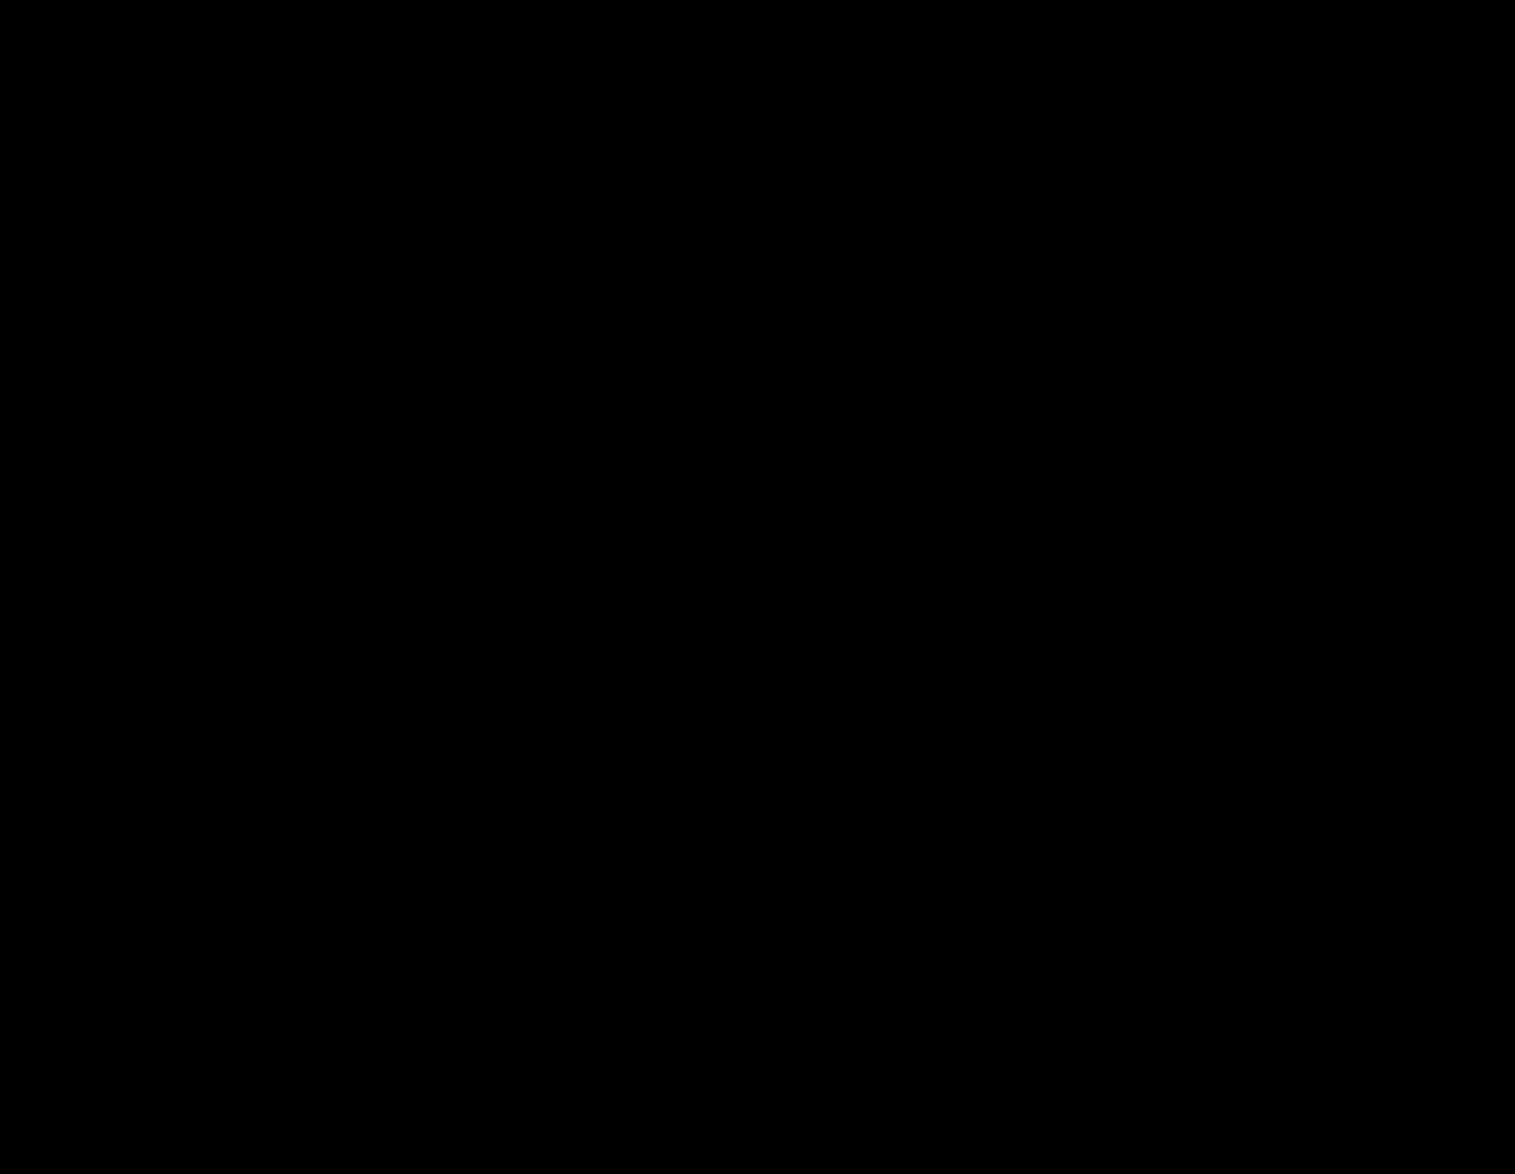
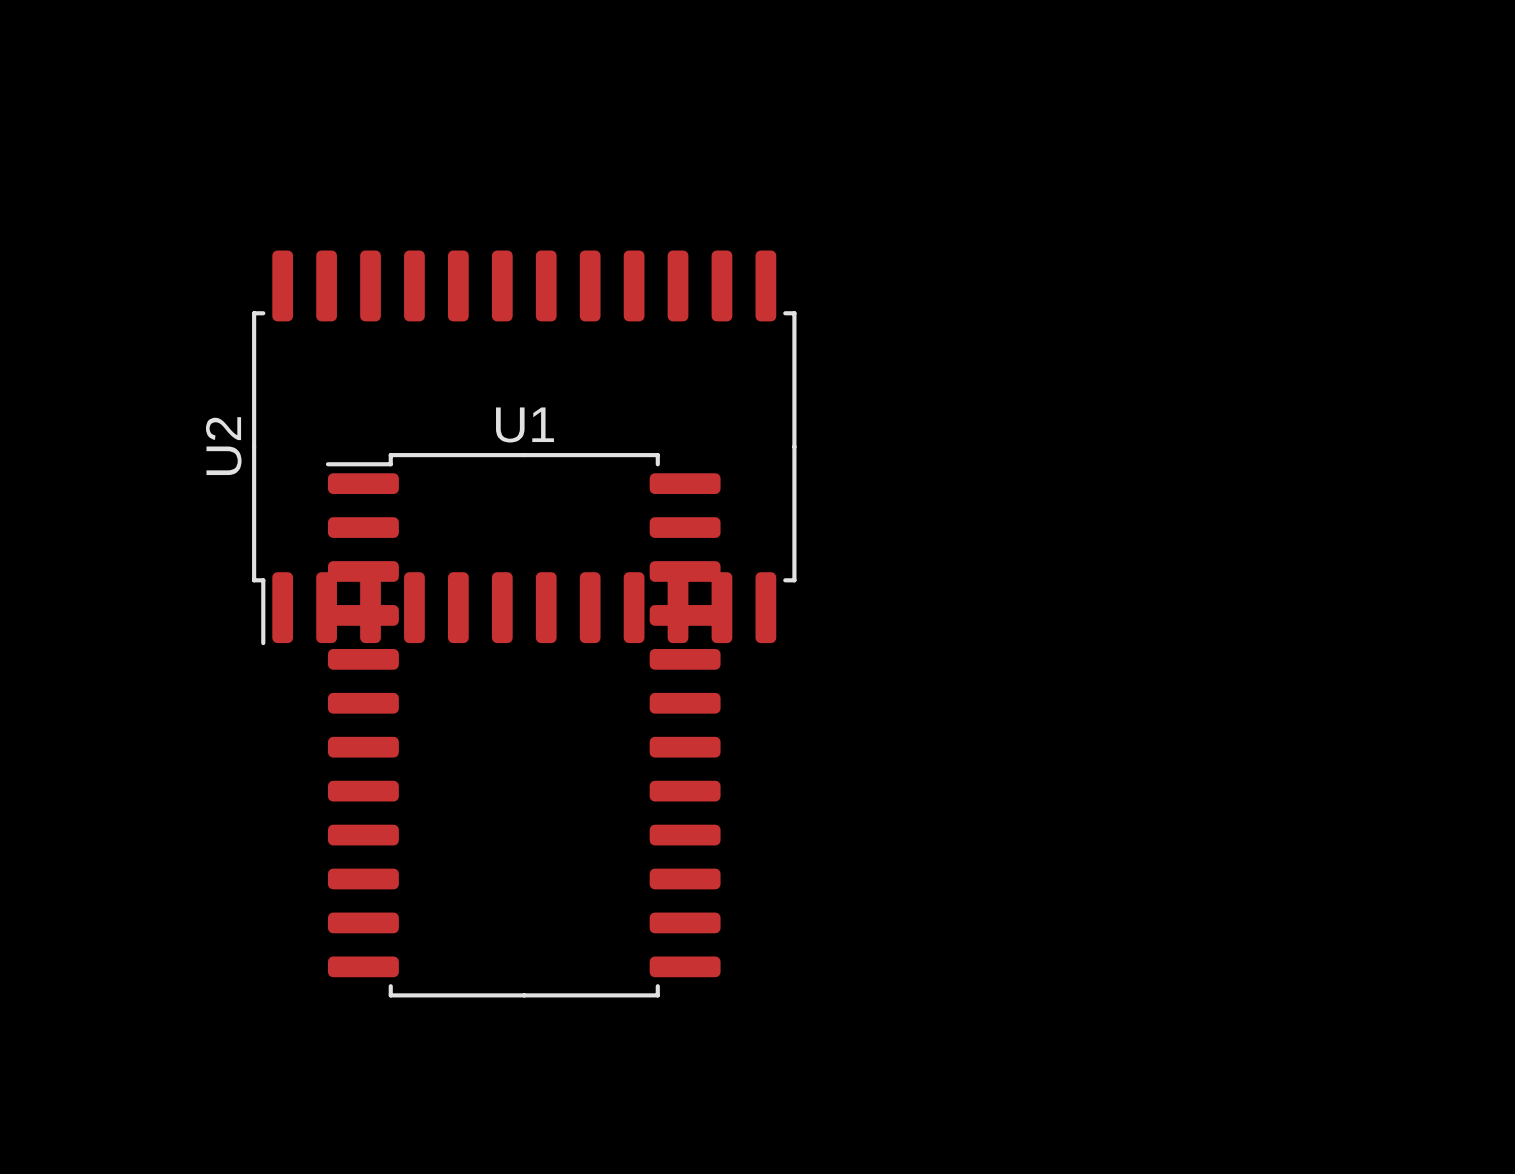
U2: none -> (524, 447)
U1: none -> (523, 725)

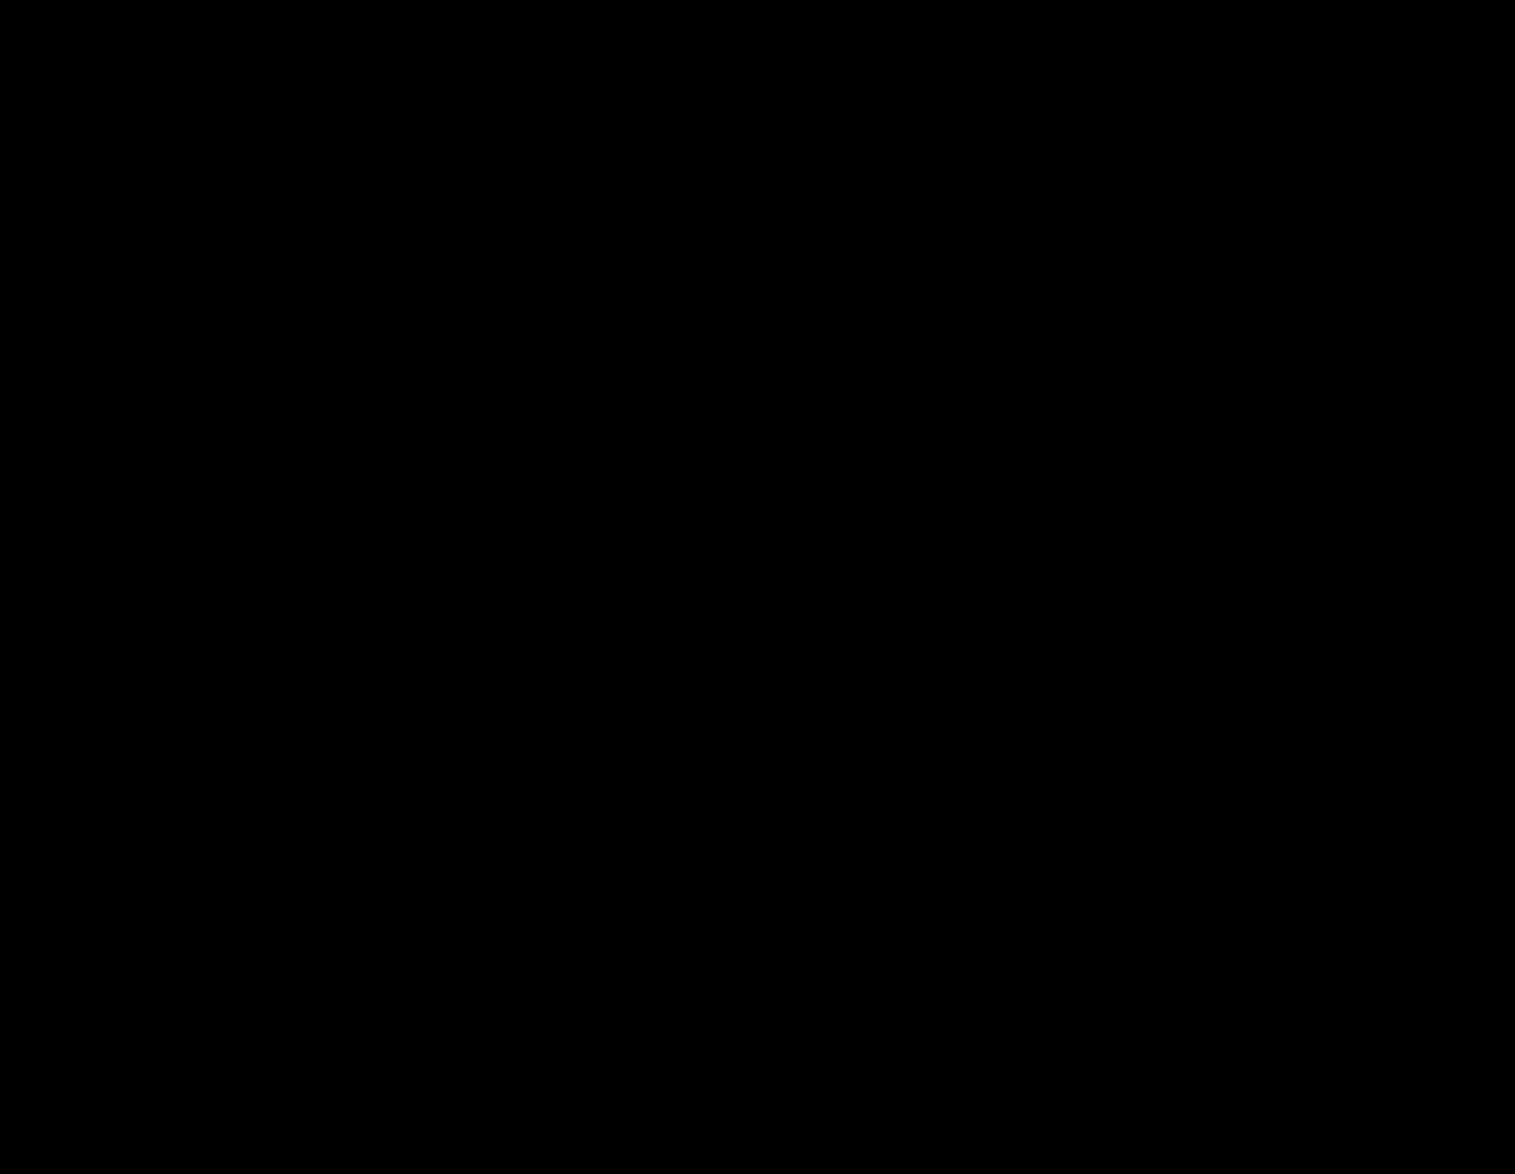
U2: (524, 447) -> none
U1: (523, 725) -> none

